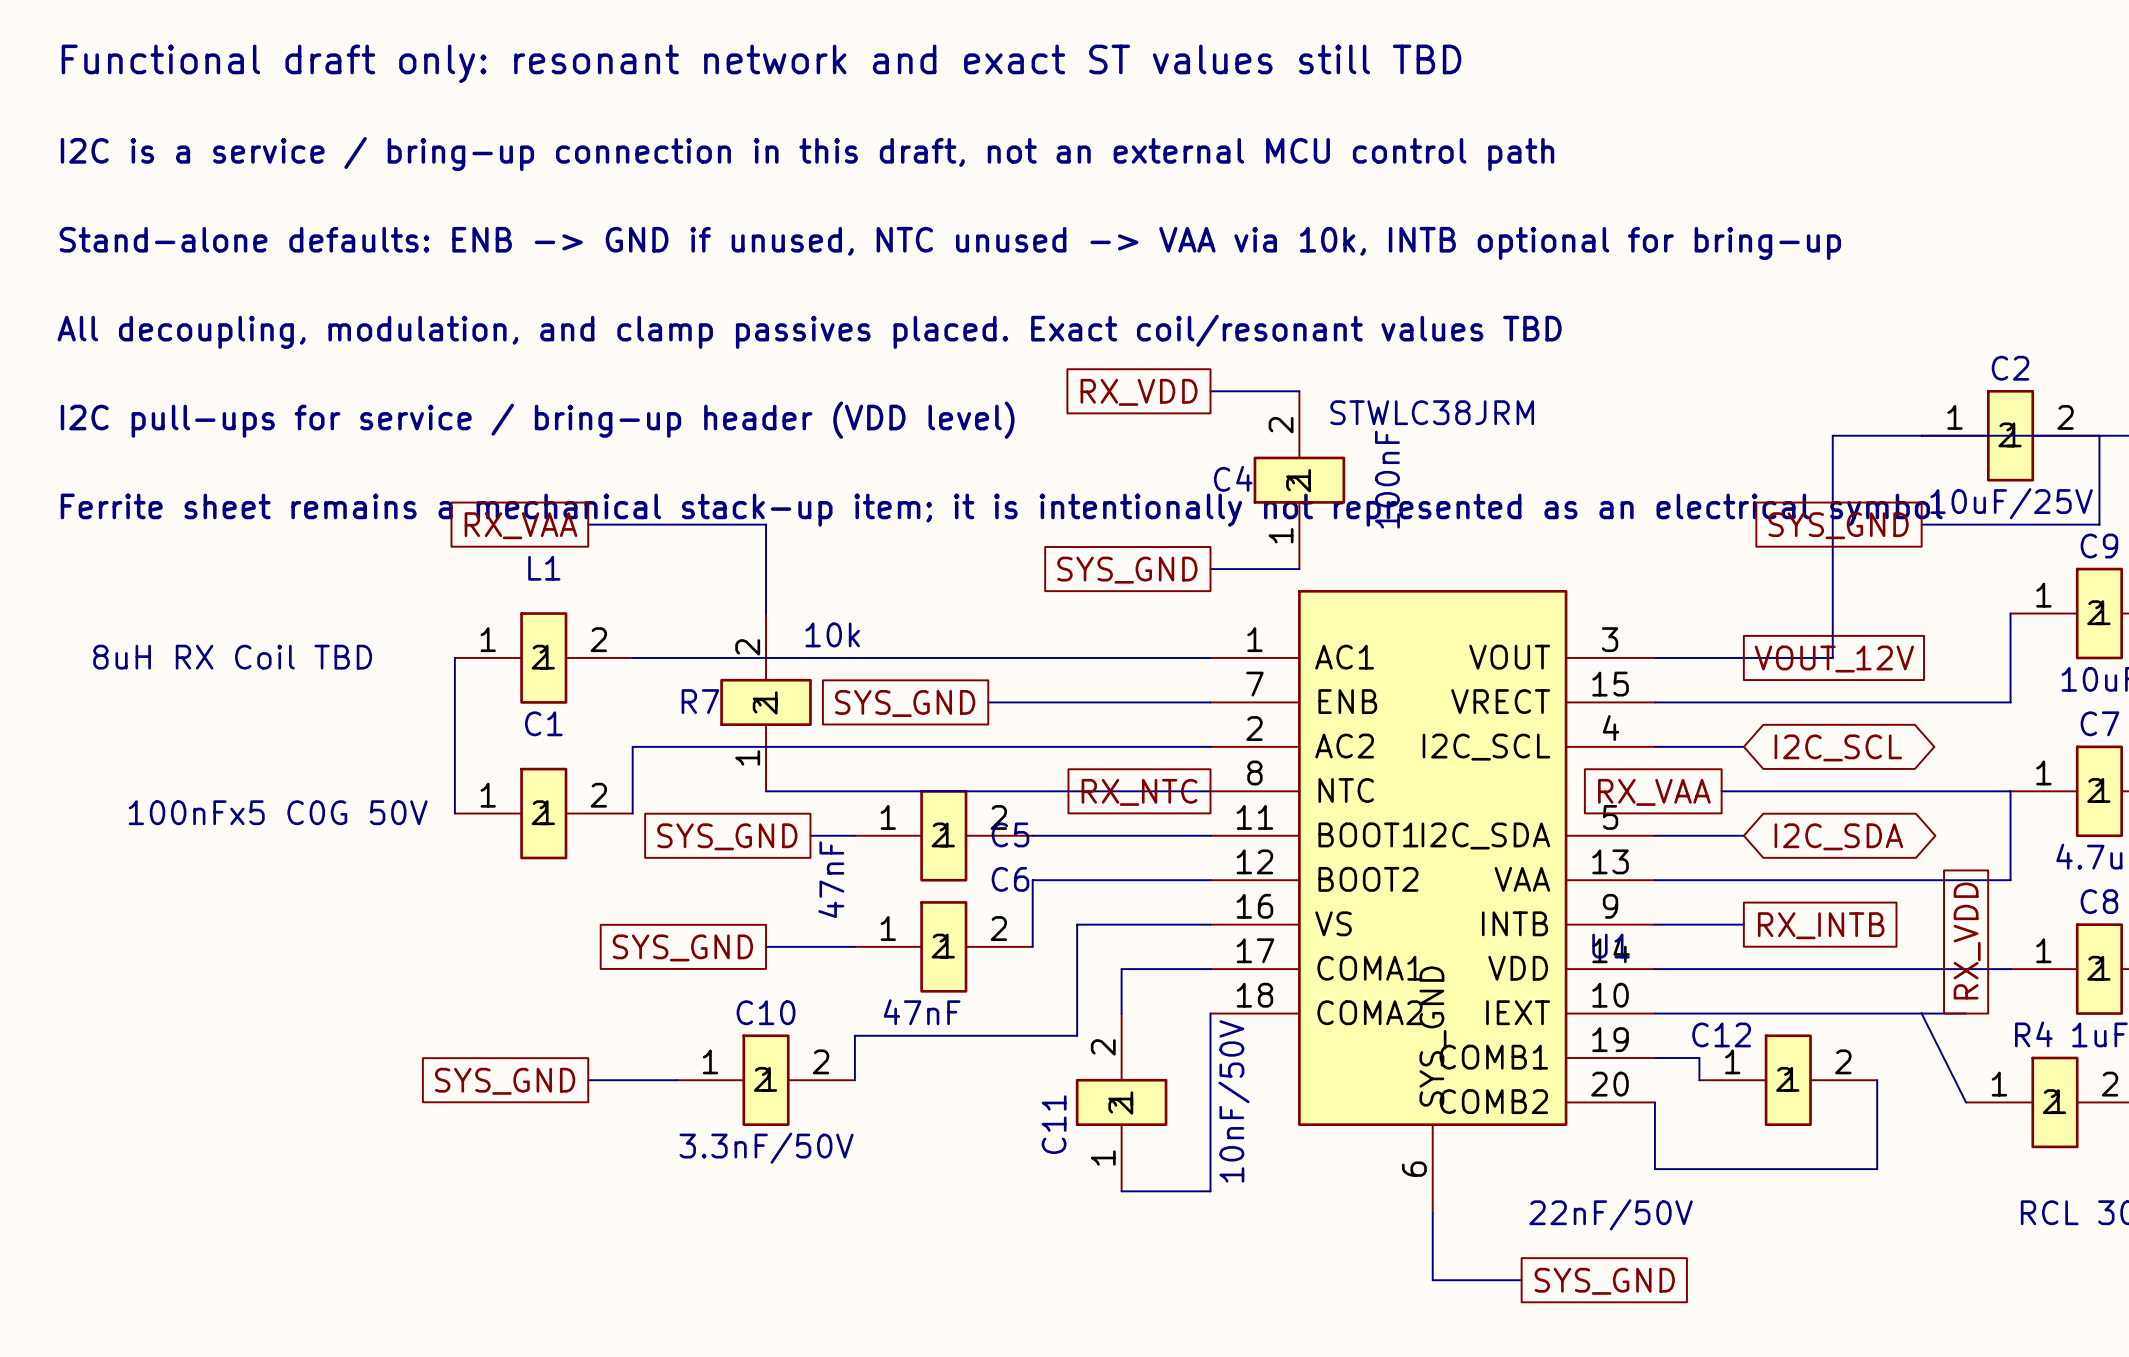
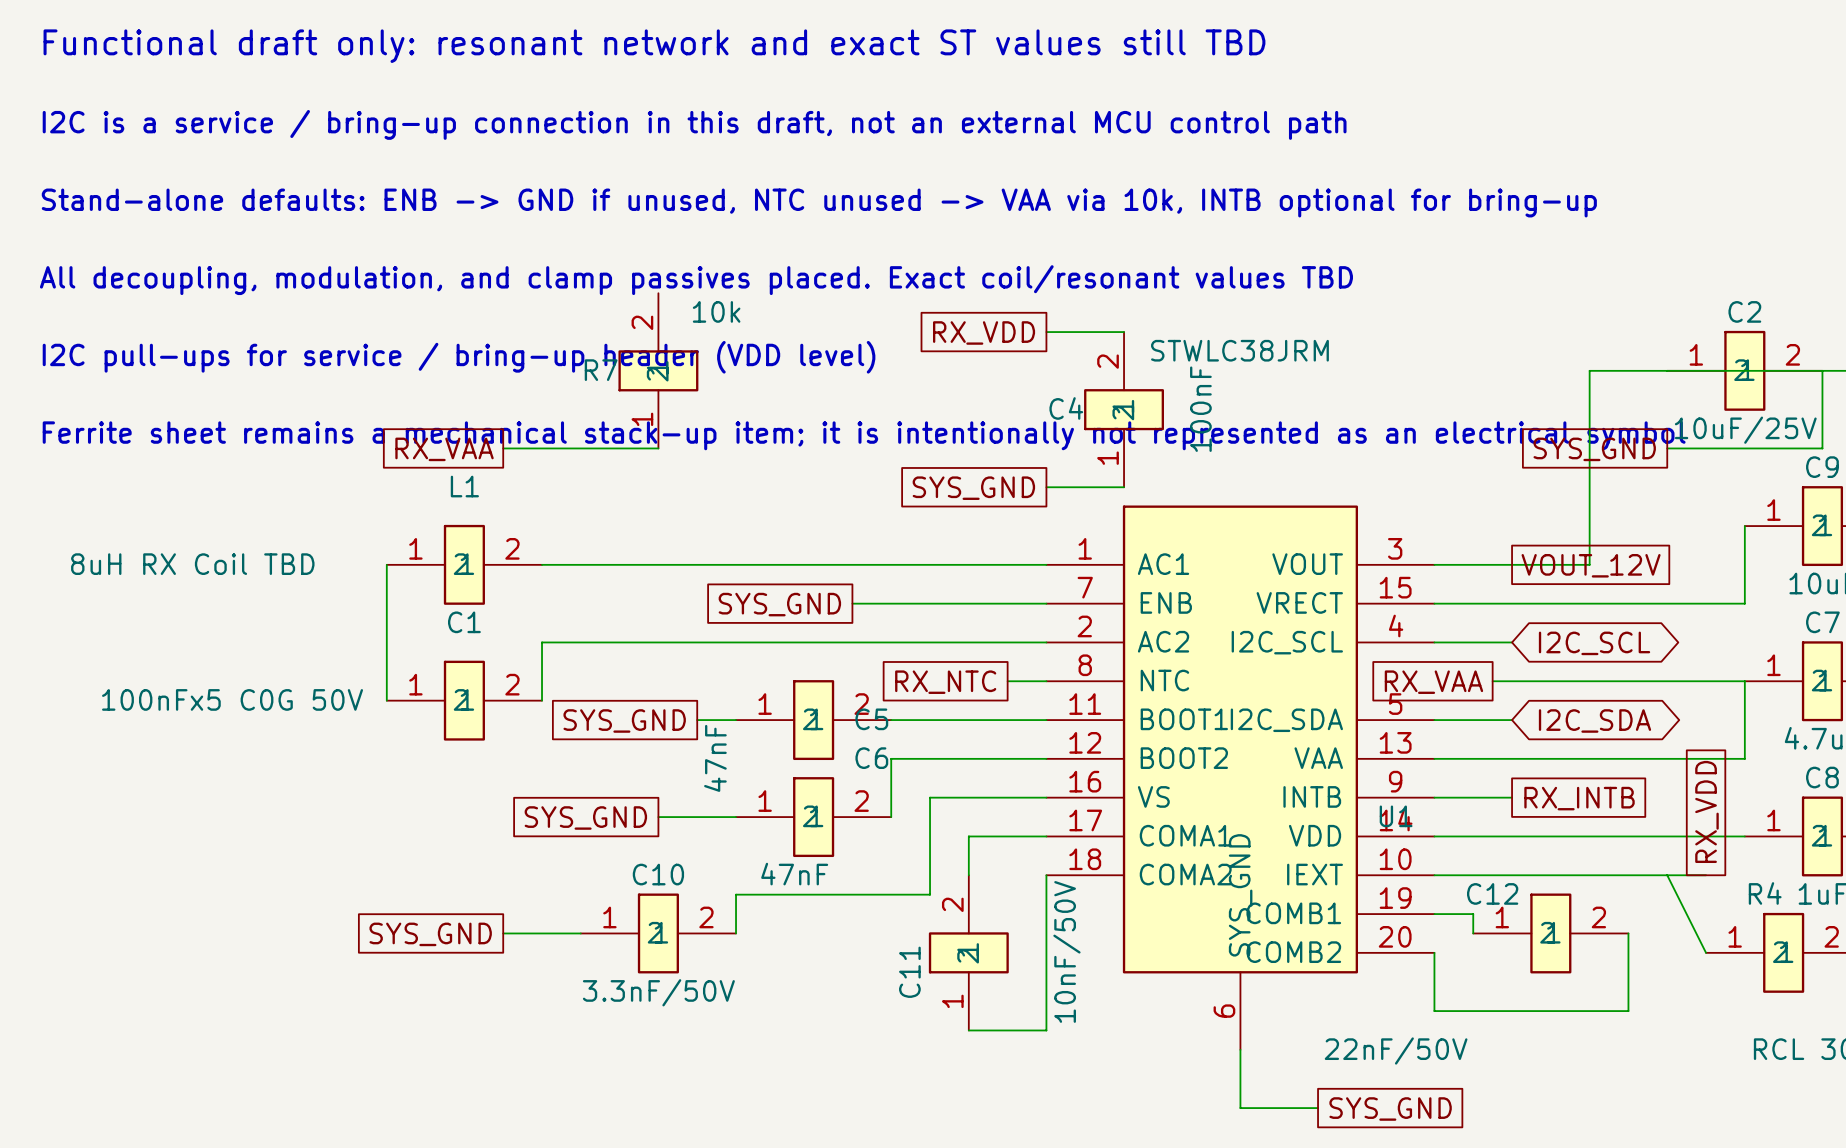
wire: (766, 524) (766, 613) -> none
R7 position: (766, 702) -> (658, 370)
wire: (766, 791) (1166, 791) -> none
global label position: RX_NTC (1139, 792) -> RX_NTC (945, 682)

